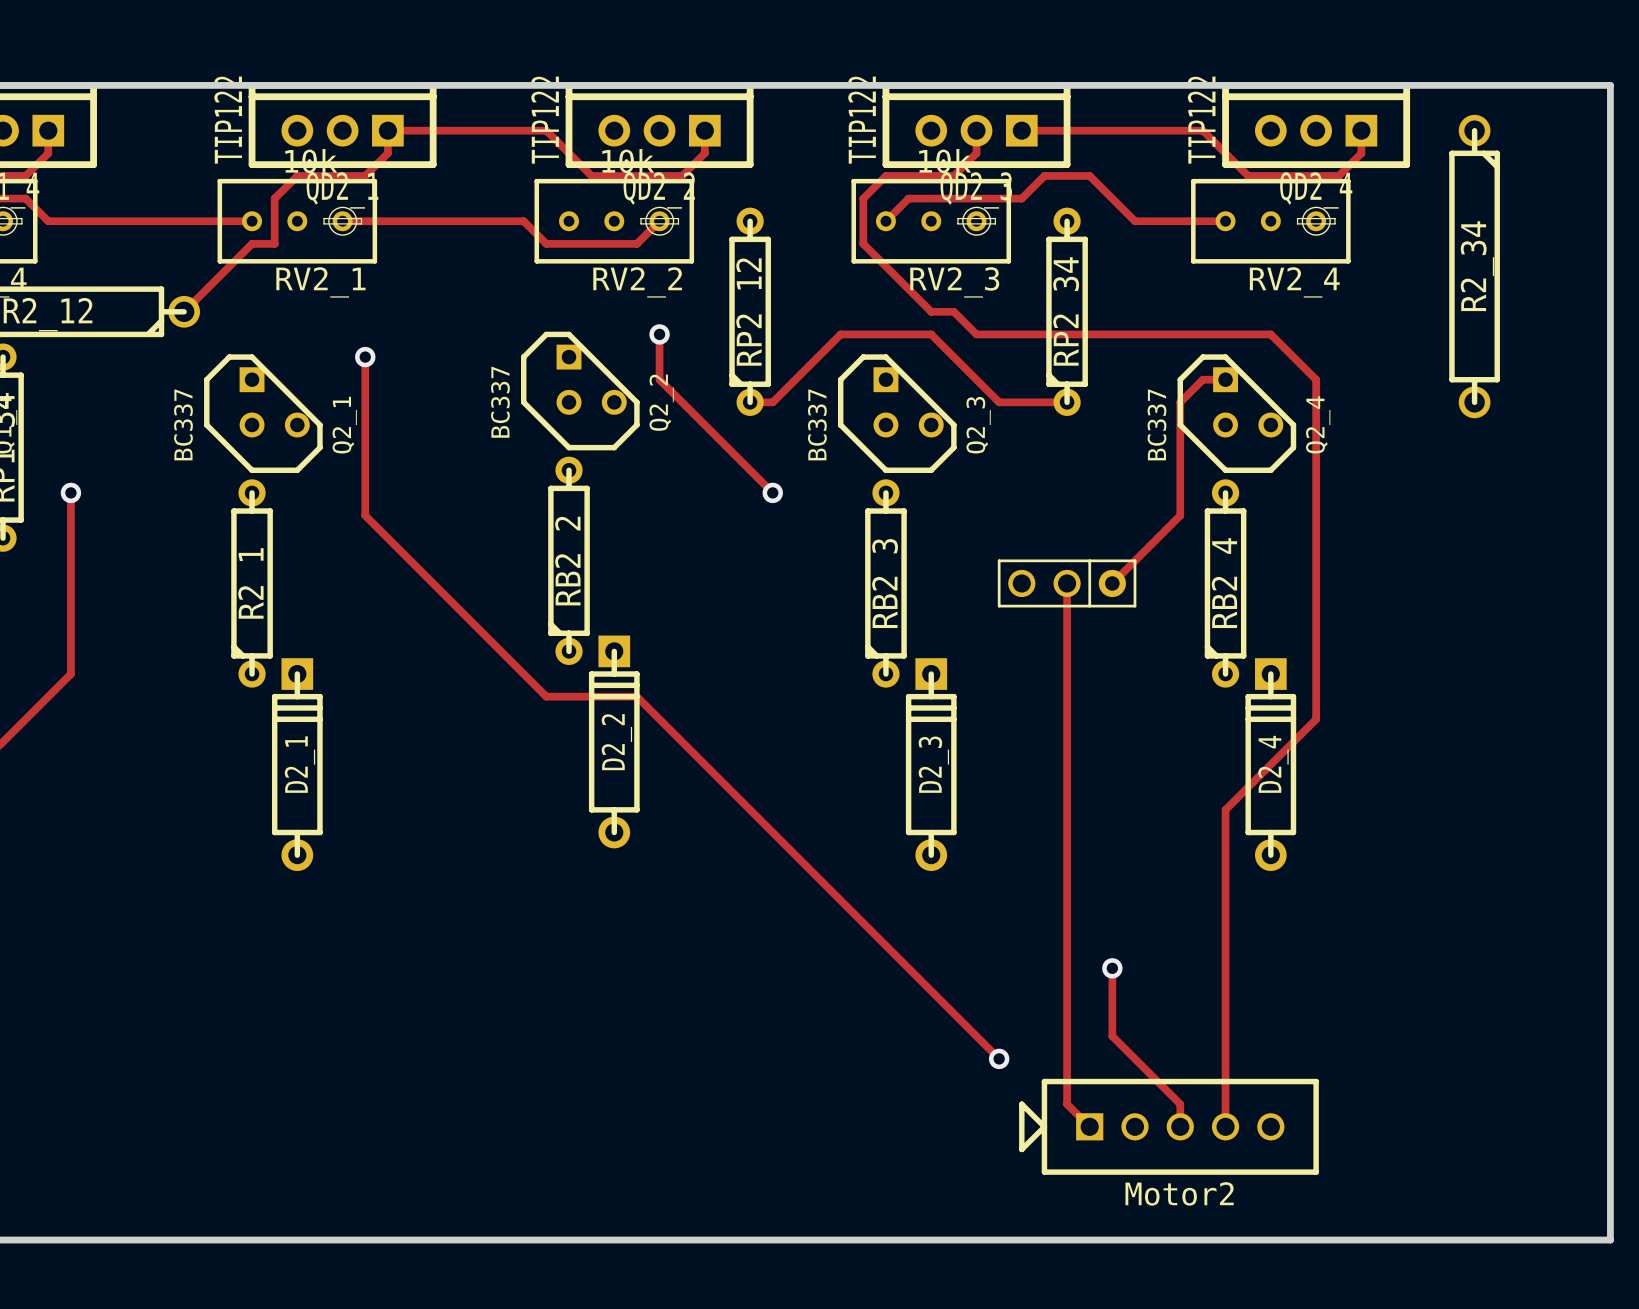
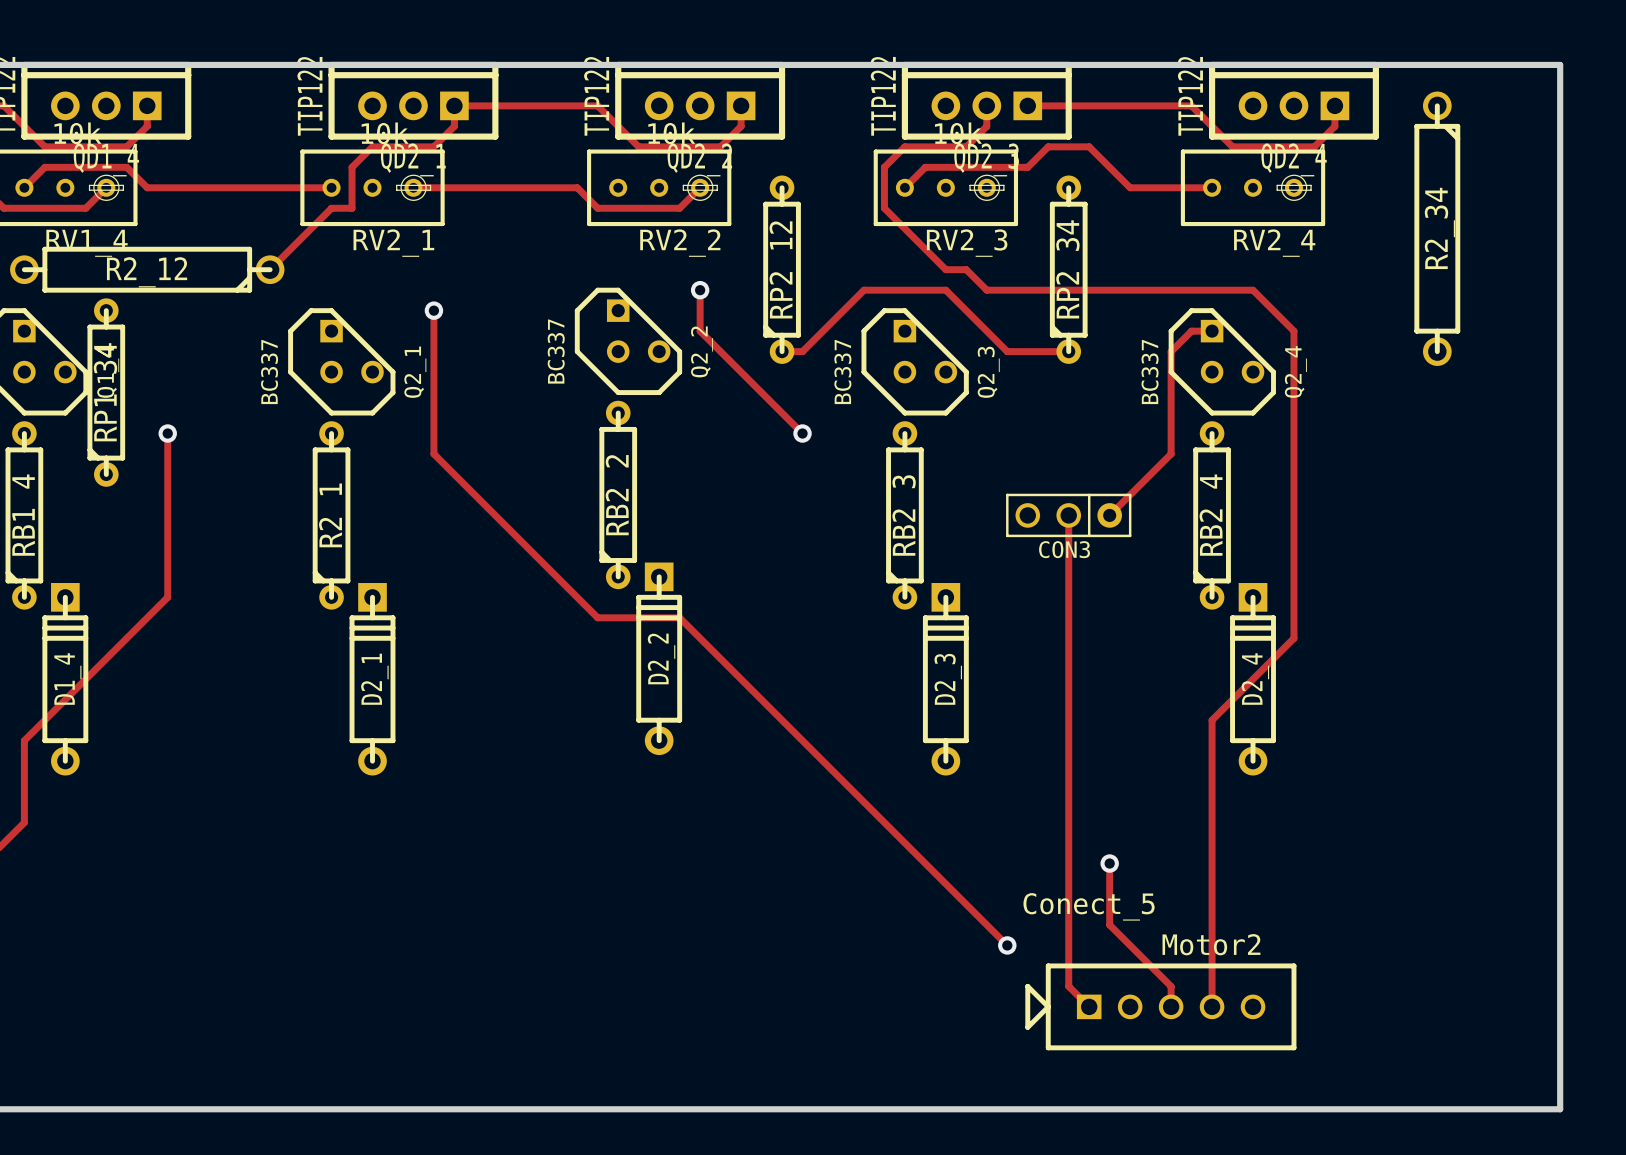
CON3 name: none -> CON3 (1064, 549)
Motor2 value: none -> Conect_5 (1089, 906)
Motor2 name position: Motor2 (1179, 1193) -> Motor2 (1211, 944)

